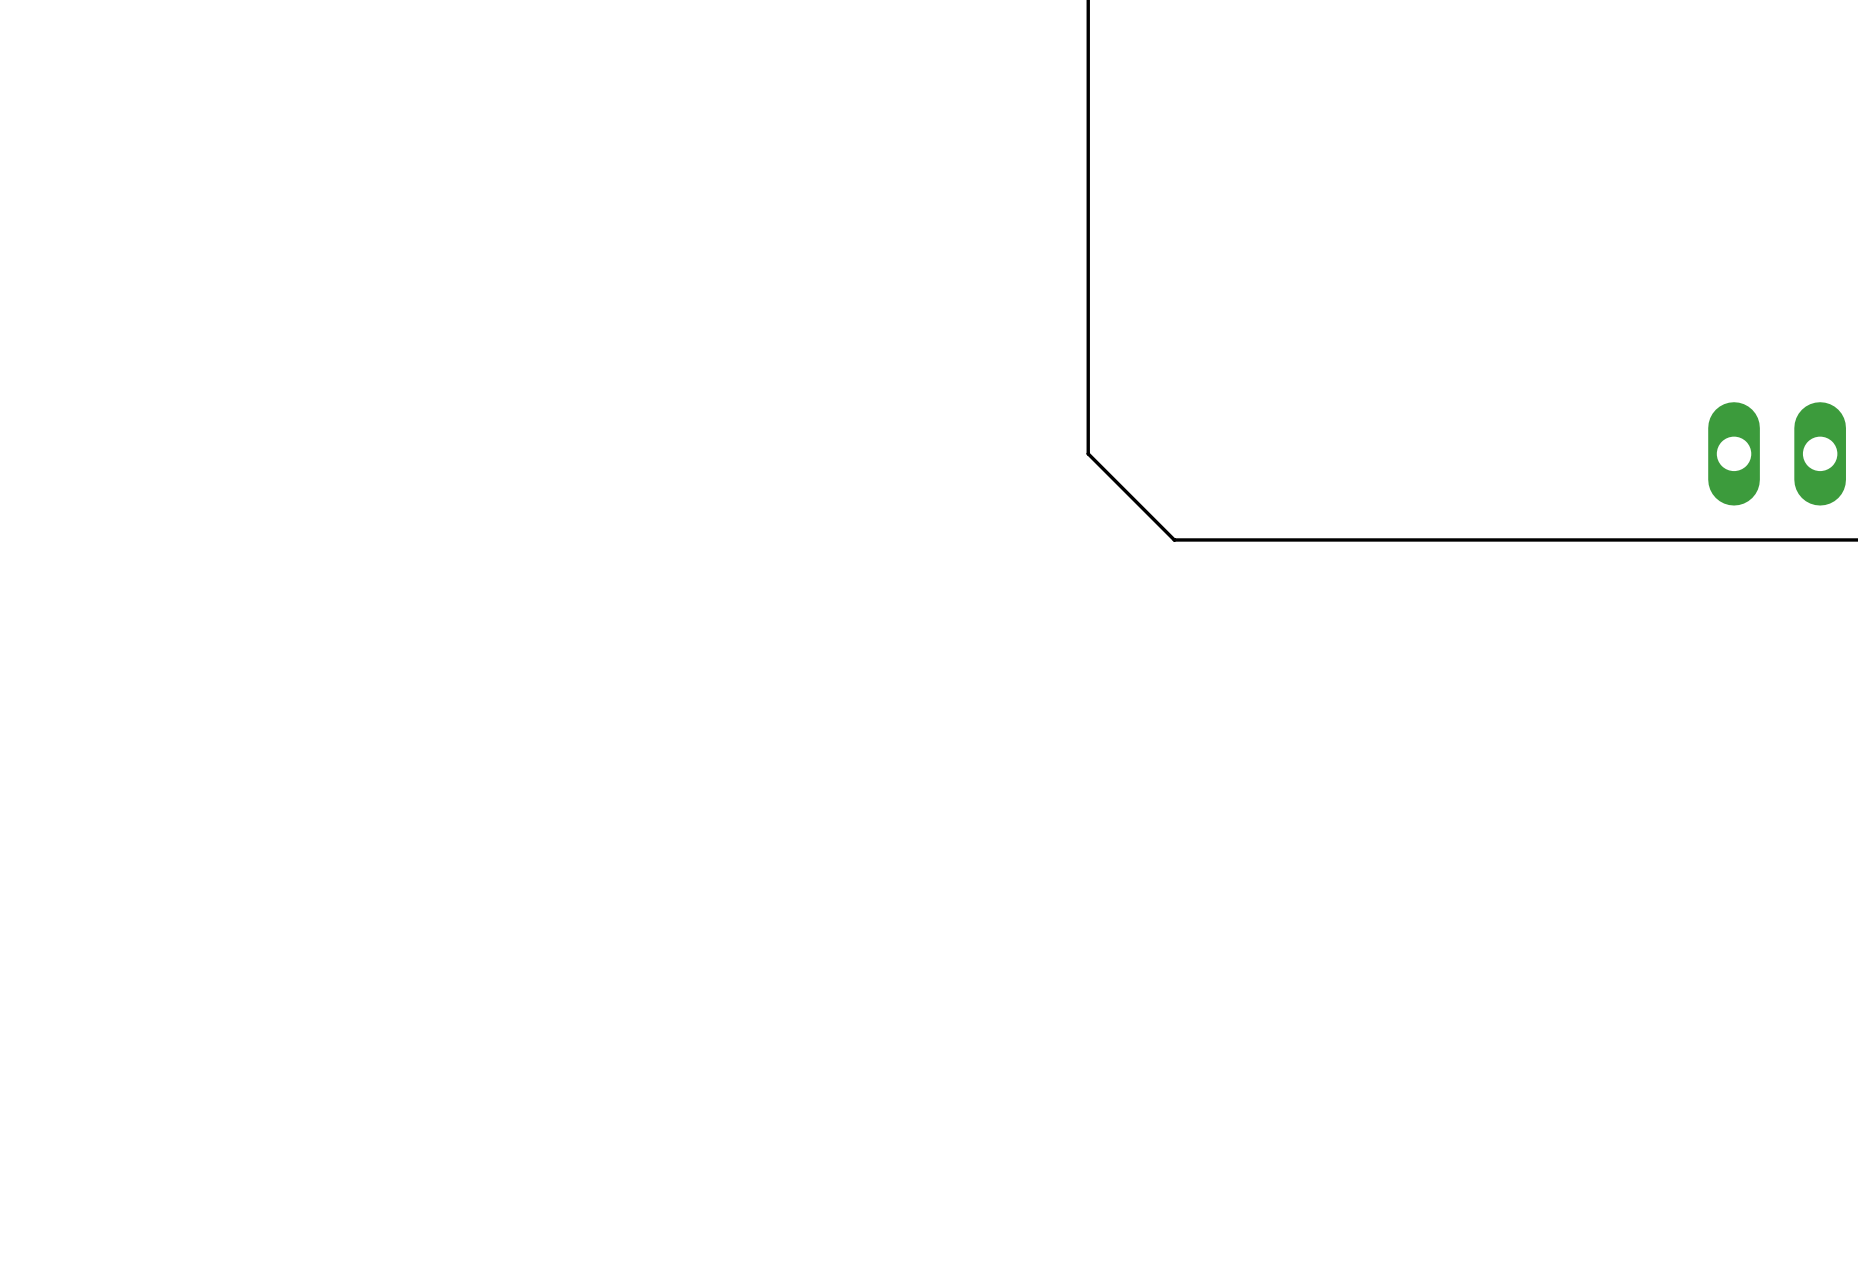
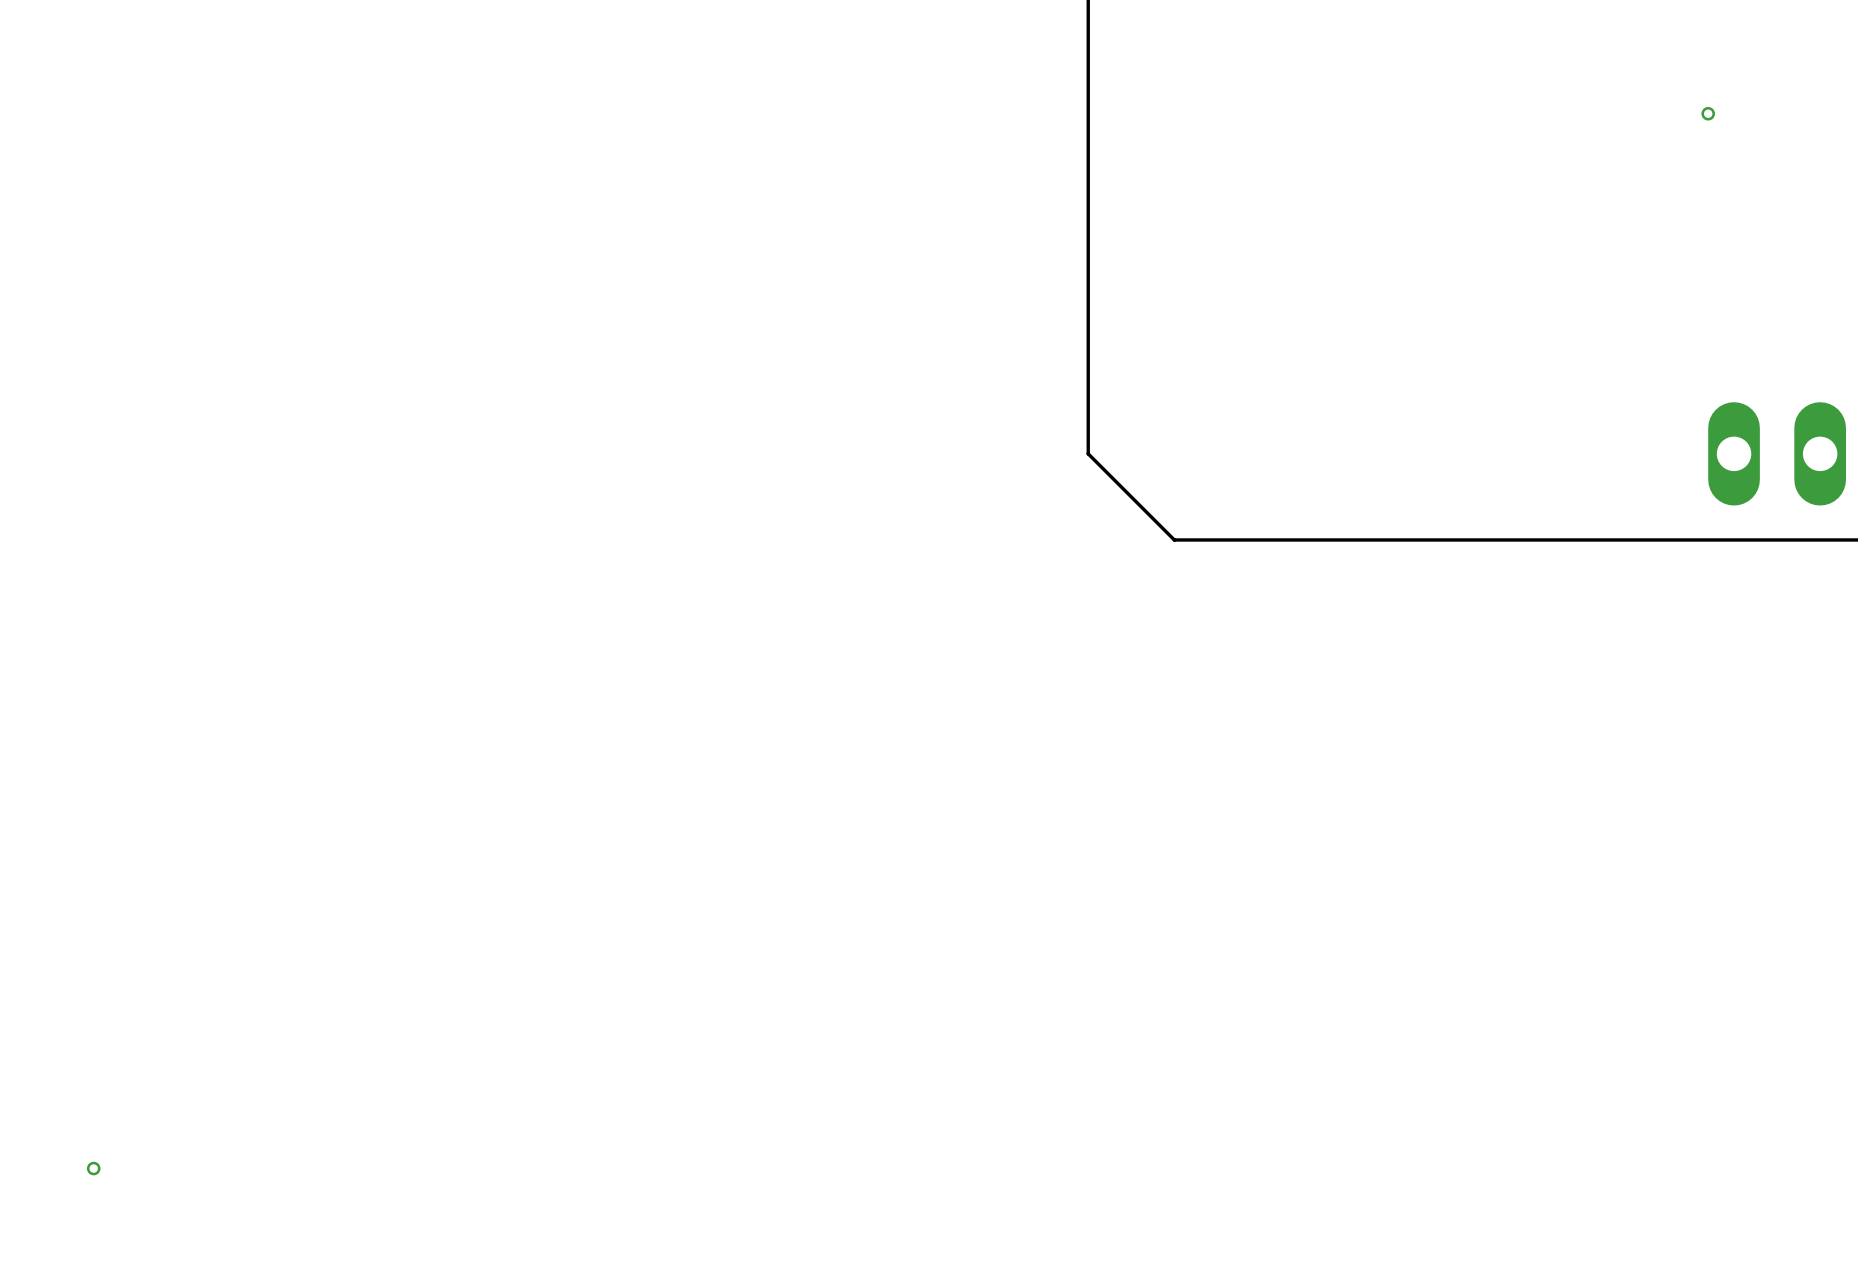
via: none -> (1708, 113)
via: none -> (93, 1168)

